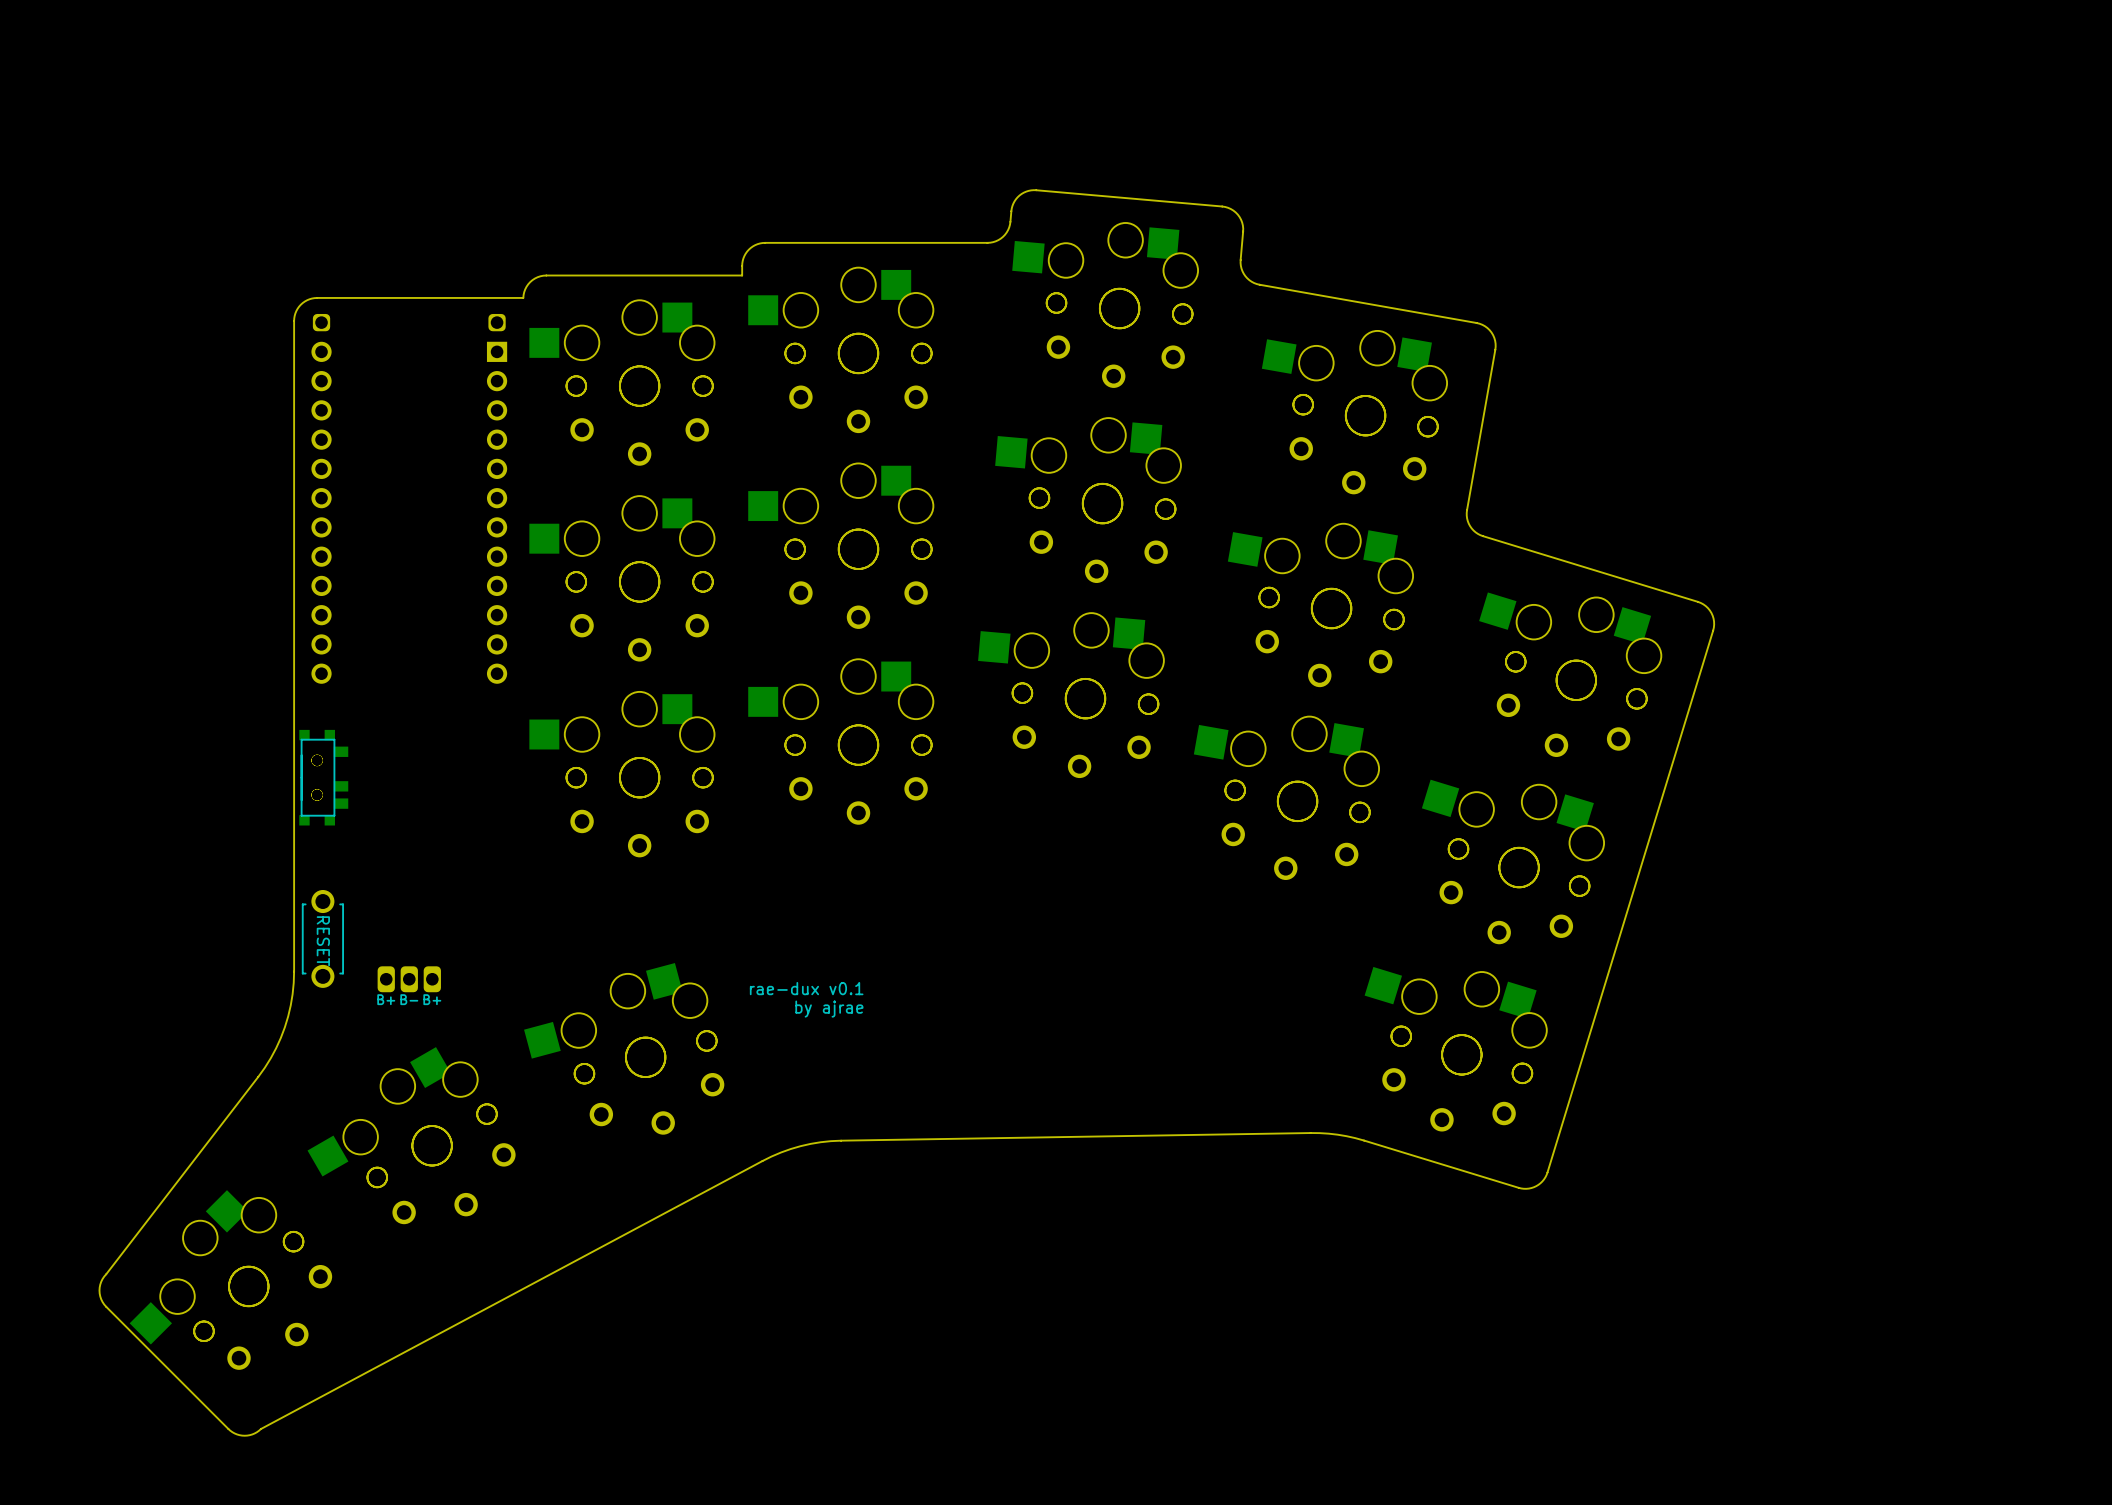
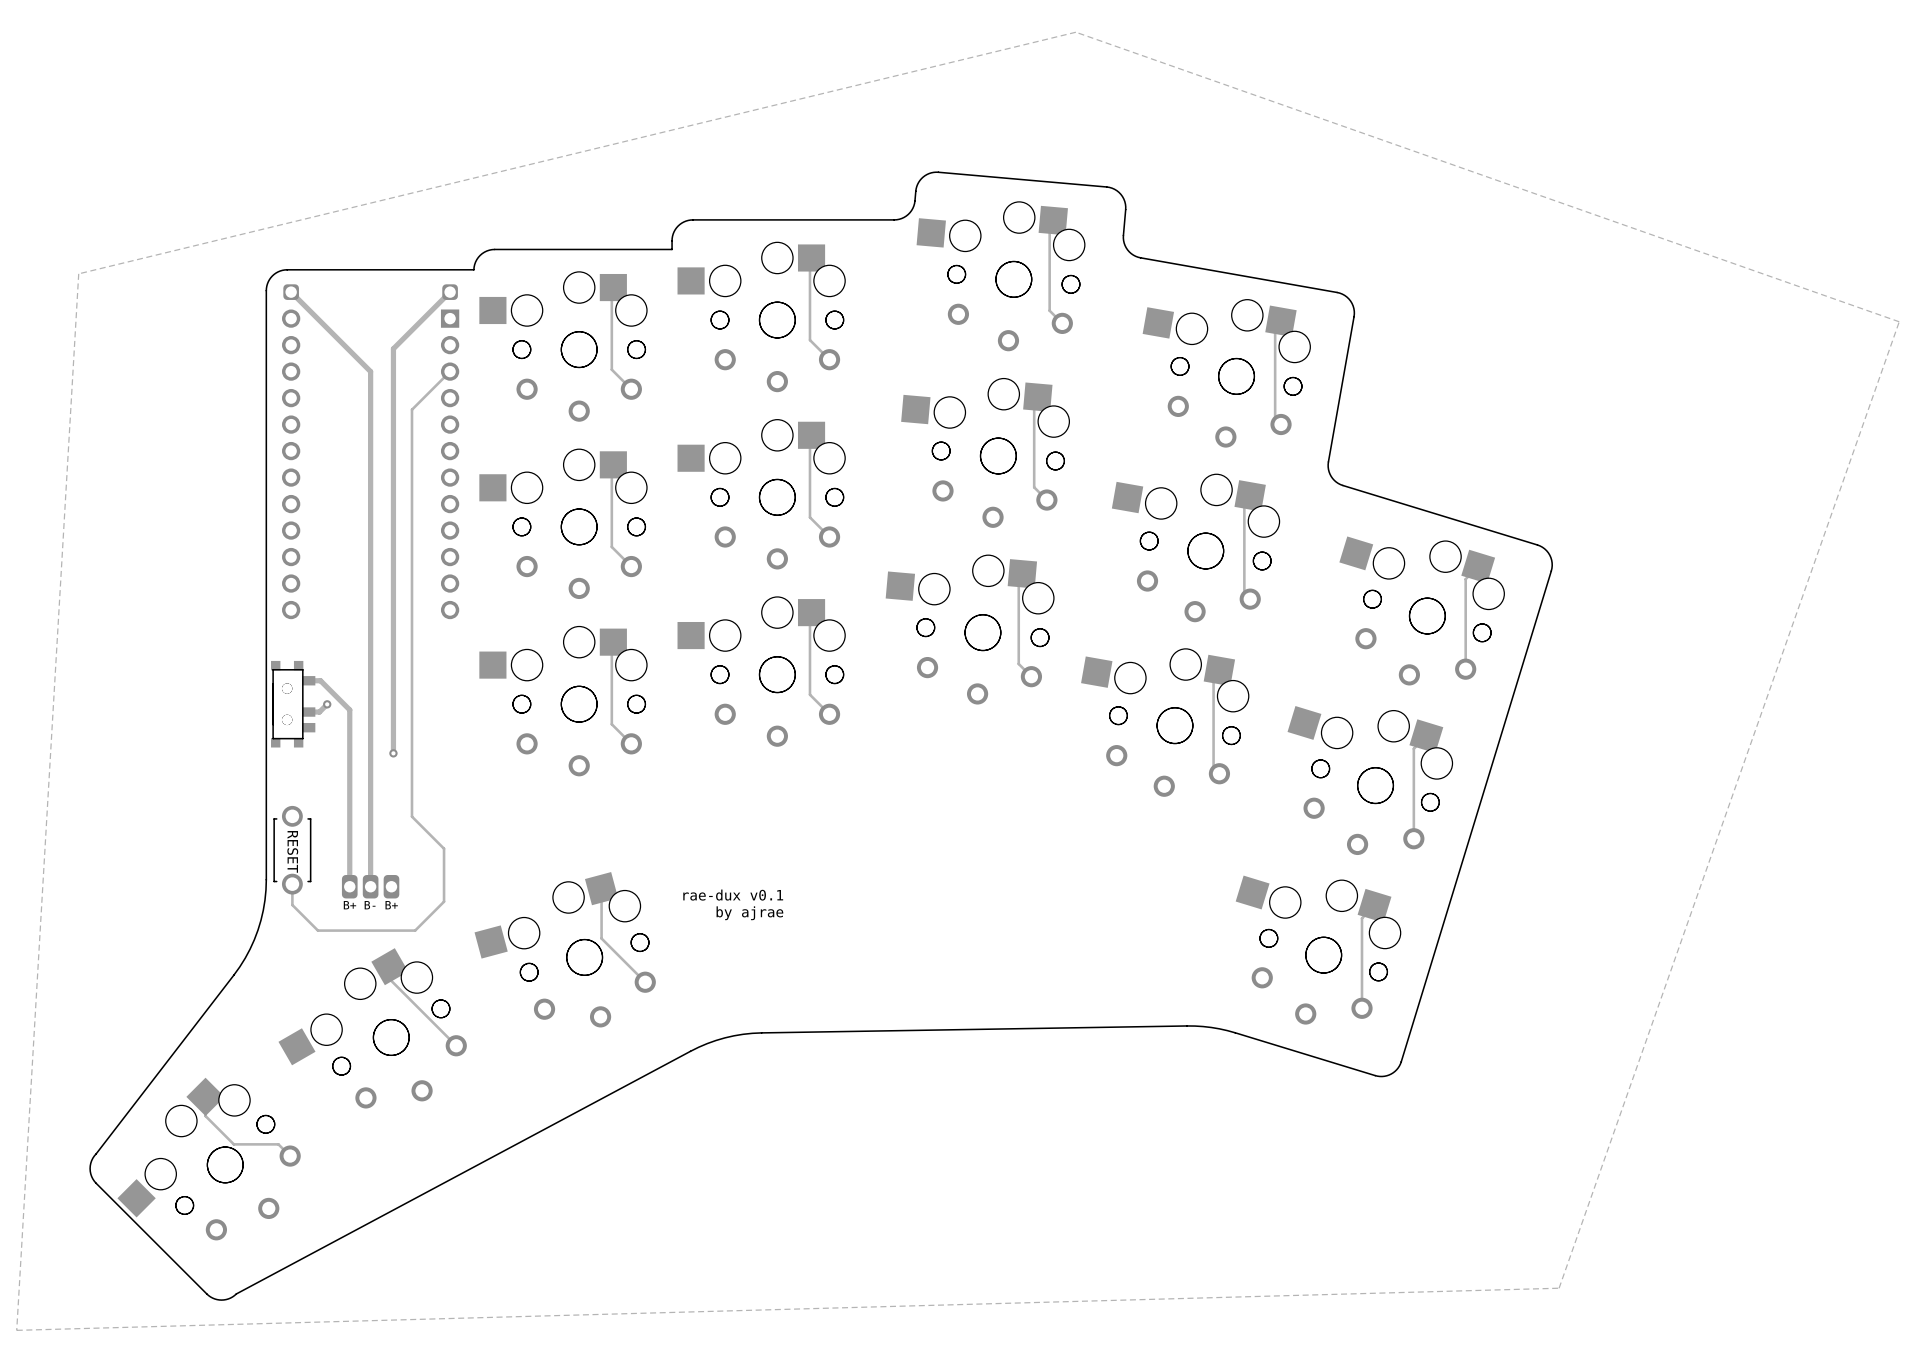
zone outline: none -> (1075, 32) (1899, 321) (1559, 1288) (16, 1330) (78, 273) (1075, 32)
track: none -> (1053, 220) (1049, 224) (1049, 310) (1062, 323)
track: none -> (811, 257) (809, 259) (809, 340) (829, 359)
track: none -> (613, 287) (611, 289) (611, 369) (631, 389)
track: none -> (291, 292) (370, 371) (370, 886)
track: none -> (450, 292) (393, 348) (393, 753)
track: none -> (1280, 321) (1275, 327) (1275, 418) (1281, 424)
track: none -> (450, 371) (411, 409) (411, 816) (444, 848) (444, 901) (415, 930) (317, 930) (292, 905) (292, 884)
track: none -> (1037, 397) (1034, 400) (1034, 487) (1046, 500)
track: none -> (811, 435) (809, 436) (809, 517) (829, 536)
track: none -> (613, 464) (611, 466) (611, 546) (631, 566)
track: none -> (1250, 495) (1244, 501) (1244, 593) (1250, 599)
track: none -> (1478, 566) (1465, 579) (1465, 669)
track: none -> (1022, 573) (1018, 577) (1018, 663) (1031, 676)
track: none -> (811, 612) (809, 614) (809, 694) (829, 714)
track: none -> (613, 642) (611, 643) (611, 724) (631, 743)
track: none -> (1219, 670) (1213, 676) (1213, 767) (1219, 773)
track: none -> (308, 680) (320, 680) (349, 709) (349, 886)
track: none -> (327, 704) (319, 712) (308, 712)
via: none -> (327, 704)
track: none -> (1426, 736) (1413, 748) (1413, 838)
via: none -> (393, 753)
track: none -> (601, 888) (601, 938) (645, 982)
track: none -> (1374, 905) (1362, 918) (1362, 1008)
track: none -> (389, 966) (389, 979) (456, 1045)
track: none -> (205, 1096) (205, 1116) (233, 1144) (278, 1144) (290, 1156)

